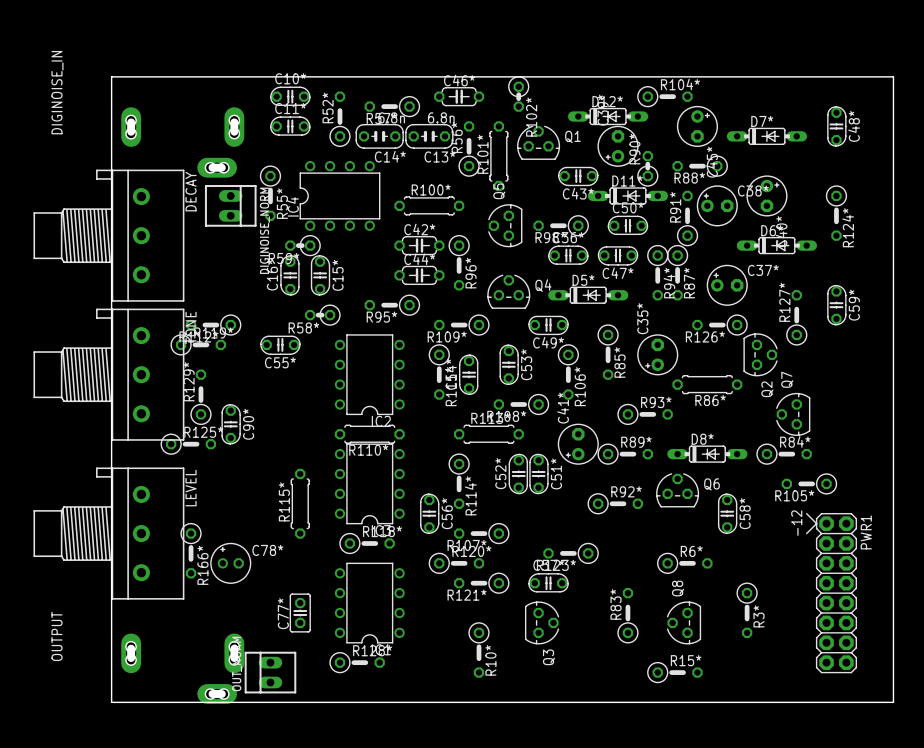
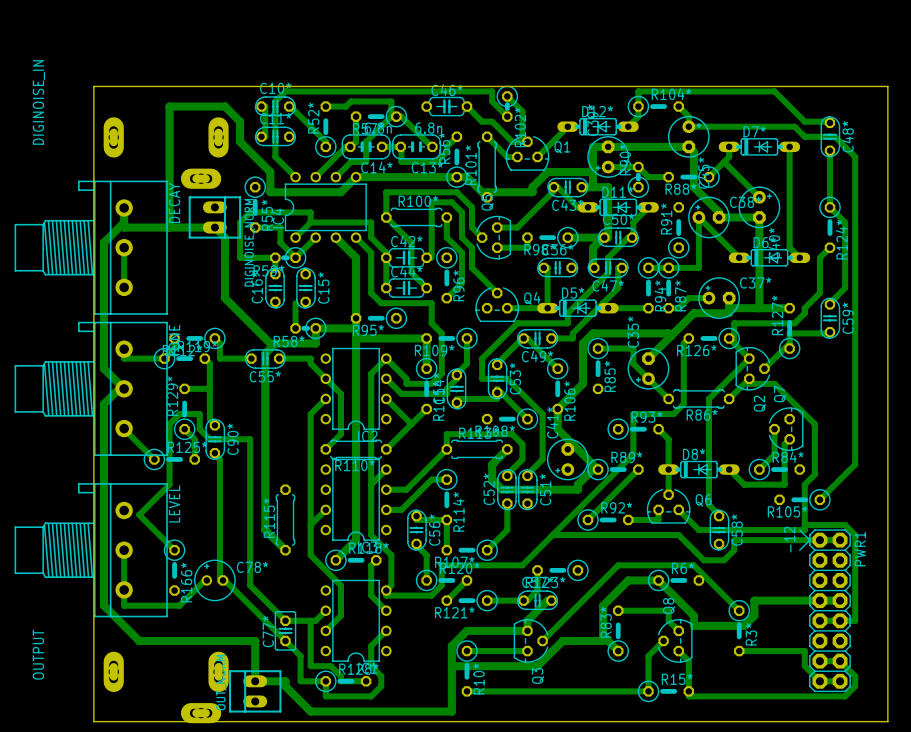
bottom track: none -> (507, 96) (522, 111) (522, 141)
bottom track: none -> (261, 106) (265, 106) (265, 136) (261, 136)
bottom track: none -> (289, 106) (325, 141) (325, 146)
bottom track: none -> (325, 106) (345, 106) (351, 101) (391, 101) (391, 116)
bottom track: none -> (466, 106) (482, 121) (492, 121) (512, 141) (527, 141)
bottom track: none -> (678, 106) (688, 116) (688, 126) (794, 126) (804, 136) (835, 136) (855, 156) (855, 464) (819, 499)
bottom track: none -> (356, 116) (356, 141) (351, 146) (345, 146) (315, 177)
bottom track: none -> (391, 116) (401, 116) (432, 146)
bottom track: none -> (391, 116) (366, 141) (366, 161) (351, 161) (335, 177)
bottom track: none -> (507, 116) (492, 101) (492, 91) (285, 91) (275, 101) (275, 156) (295, 177)
bottom track: none -> (829, 122) (804, 121) (774, 91) (638, 91) (638, 116) (628, 126)
bottom track: none -> (567, 126) (537, 156)
bottom track: none -> (456, 136) (446, 146) (446, 151) (436, 161) (401, 161) (401, 146) (382, 146)
bottom track: none -> (487, 136) (507, 156) (517, 156)
bottom track: none -> (729, 146) (729, 156) (708, 177)
bottom track: none -> (789, 146) (789, 247) (799, 257)
bottom track: none -> (829, 150) (829, 207) (845, 222) (845, 288) (829, 304)
bottom track: none -> (724, 161) (759, 197)
bottom track: none -> (608, 167) (638, 167) (648, 177) (668, 177)
bottom track: none -> (593, 172) (547, 172) (532, 187) (532, 192) (487, 192) (487, 197) (466, 177) (356, 177) (340, 192) (270, 192) (270, 172) (240, 141) (240, 121) (224, 106) (169, 106) (169, 227)
bottom track: none -> (581, 187) (608, 187) (608, 237) (603, 237) (593, 247) (593, 267)
bottom track: none -> (593, 187) (593, 146) (688, 146) (693, 151) (693, 187) (719, 212) (719, 217) (759, 217) (759, 308)
bottom track: none -> (587, 207) (577, 207) (557, 187) (552, 187) (552, 192) (517, 227) (497, 227)
bottom track: none -> (648, 207) (633, 222) (633, 237) (628, 237) (608, 257) (608, 272) (567, 313) (567, 323) (517, 323) (482, 358) (482, 378) (507, 378) (542, 414) (542, 459) (527, 475)
bottom track: none -> (124, 208) (124, 227) (214, 227) (224, 237) (224, 298) (272, 346)
bottom track: none -> (446, 217) (446, 237) (461, 252) (461, 283) (446, 298)
bottom track: none -> (124, 222) (103, 242) (103, 368) (124, 388) (119, 388) (103, 404) (103, 605) (139, 640) (255, 640) (255, 681) (285, 681) (285, 686) (310, 711) (451, 711) (451, 646) (466, 630) (527, 630) (527, 620) (547, 600) (551, 600)
bottom track: none -> (310, 222) (310, 212) (250, 212) (240, 222) (240, 257) (275, 257) (275, 274)
bottom track: none -> (310, 222) (295, 237)
bottom track: none -> (310, 222) (371, 222) (371, 237) (386, 252) (386, 288)
bottom track: none -> (255, 227) (280, 227) (280, 242) (295, 257) (315, 237)
bottom track: none -> (335, 237) (356, 257) (356, 540) (335, 560)
bottom track: none -> (356, 237) (371, 252) (371, 293) (381, 303) (431, 303) (431, 323) (441, 333) (441, 373) (431, 383) (406, 383) (406, 378) (386, 358) (371, 373) (371, 535) (391, 555) (391, 585) (386, 590) (386, 595) (431, 595) (441, 585) (441, 565) (522, 565) (633, 454) (633, 414) (673, 414) (683, 404) (683, 343) (688, 338)
bottom track: none -> (482, 237) (472, 227) (472, 207) (456, 192) (386, 192) (386, 217) (411, 242) (411, 272) (426, 288)
bottom track: none -> (527, 237) (527, 247) (497, 247)
bottom track: none -> (567, 237) (598, 237) (600, 240)
bottom track: none -> (124, 247) (124, 287)
bottom track: none -> (829, 247) (819, 257) (819, 293) (804, 308) (804, 313) (794, 323) (734, 323) (734, 343)
bottom track: none -> (431, 257) (431, 202) (451, 202) (461, 212) (461, 237) (472, 247) (472, 267) (497, 293)
bottom track: none -> (739, 257) (698, 217) (698, 267) (648, 267)
bottom track: none -> (543, 267) (547, 267) (547, 308) (507, 308)
bottom track: none -> (622, 267) (618, 267) (618, 288) (572, 333) (572, 338) (551, 338)
bottom track: none -> (708, 298) (688, 298) (678, 308) (668, 308)
bottom track: none -> (729, 298) (729, 313) (693, 313) (648, 358)
bottom track: none -> (295, 303) (295, 328)
bottom track: none -> (603, 303) (608, 308) (648, 308)
bottom track: none -> (729, 308) (789, 308)
bottom track: none -> (356, 328) (315, 328) (315, 343) (275, 343) (265, 353) (265, 530) (285, 550)
bottom track: none -> (829, 332) (789, 333) (789, 348)
bottom track: none -> (671, 335) (668, 333) (593, 333) (582, 343) (582, 383) (557, 409) (557, 429) (598, 469) (593, 469) (577, 484) (577, 489) (502, 489) (492, 479) (492, 464) (507, 449)
bottom track: none -> (174, 338) (174, 348) (164, 358) (124, 358) (124, 349)
bottom track: none -> (214, 338) (219, 343) (219, 358) (251, 358)
bottom track: none -> (356, 338) (426, 338) (426, 368)
bottom track: none -> (466, 338) (466, 363) (456, 373) (456, 378) (446, 388) (446, 393) (401, 393) (386, 378)
bottom track: none -> (729, 338) (749, 358) (708, 398) (708, 504) (719, 516)
bottom track: none -> (789, 343) (764, 368)
bottom track: none -> (598, 348) (633, 348) (633, 363) (668, 398)
bottom track: none -> (204, 358) (209, 363) (209, 419) (214, 425)
bottom track: none -> (279, 358) (310, 358) (310, 363) (340, 393) (340, 434) (325, 449)
bottom track: none -> (497, 364) (522, 338) (527, 338) (557, 368)
bottom track: none -> (184, 388) (209, 388)
bottom track: none -> (325, 398) (310, 414) (310, 525)
bottom track: none -> (386, 398) (411, 424)
bottom track: none -> (729, 398) (749, 378) (749, 383) (774, 383) (814, 424) (814, 474) (804, 484) (804, 530) (698, 530) (678, 509)
bottom track: none -> (456, 402) (456, 398) (497, 398) (497, 388) (527, 419)
bottom track: none -> (426, 409) (386, 449)
bottom track: none -> (124, 428) (154, 459)
bottom track: none -> (184, 429) (194, 439) (194, 459)
bottom track: none -> (658, 429) (668, 439) (668, 494)
bottom track: none -> (774, 429) (774, 454) (759, 469)
bottom track: none -> (789, 439) (784, 444) (784, 484) (744, 484) (729, 469)
bottom track: none -> (214, 453) (219, 459) (219, 580) (224, 580) (300, 656) (300, 681) (325, 681) (325, 696) (371, 696) (381, 686) (381, 676) (371, 666) (371, 646) (386, 630)
bottom track: none -> (386, 469) (371, 484)
bottom track: none -> (638, 469) (587, 519)
bottom track: none -> (507, 475) (522, 459) (522, 444) (512, 434) (446, 434) (446, 449) (406, 489) (386, 489)
bottom track: none -> (446, 479) (431, 479) (401, 509) (386, 509)
bottom track: none -> (507, 503) (507, 530) (487, 550)
bottom track: none -> (325, 509) (310, 525)
bottom track: none -> (658, 509) (658, 519) (628, 519)
bottom track: none -> (416, 516) (416, 519) (446, 519) (446, 550)
bottom track: none -> (310, 525) (310, 555) (340, 585) (340, 615) (325, 630)
bottom track: none -> (804, 525) (845, 525) (855, 535) (855, 620) (819, 620)
bottom track: none -> (552, 535) (678, 535) (703, 560) (724, 560) (734, 550) (734, 540) (840, 540)
bottom track: none -> (416, 543) (426, 555) (426, 580)
bottom track: none -> (124, 550) (124, 605) (179, 605) (206, 580)
bottom track: none -> (174, 550) (139, 514) (169, 484) (169, 424) (179, 414) (199, 414) (199, 429) (209, 439) (250, 439) (250, 585) (285, 620) (315, 620) (325, 610)
bottom track: none -> (376, 560) (371, 565) (371, 595) (386, 610)
bottom track: none -> (537, 570) (537, 590) (527, 600) (487, 600)
bottom track: none -> (466, 580) (446, 600)
bottom track: none -> (840, 600) (754, 600) (754, 615) (744, 625) (693, 625) (693, 615) (658, 580) (628, 580) (603, 605) (603, 635) (618, 651)
bottom track: none -> (618, 610) (668, 610) (668, 620) (678, 630)
bottom track: none -> (739, 610) (693, 565) (618, 565) (542, 640)
bottom track: none -> (310, 620) (310, 666) (330, 666) (340, 676) (340, 681) (366, 681)
bottom track: none -> (605, 638) (603, 640) (562, 640) (537, 666) (451, 666)
bottom track: none -> (663, 640) (648, 656) (648, 691) (466, 691)
bottom track: none -> (466, 651) (527, 651)
bottom track: none -> (678, 651) (688, 661) (688, 696) (845, 696) (855, 686) (855, 676) (840, 661) (819, 661)
bottom track: none -> (739, 651) (804, 651) (804, 666) (819, 681) (840, 681)

